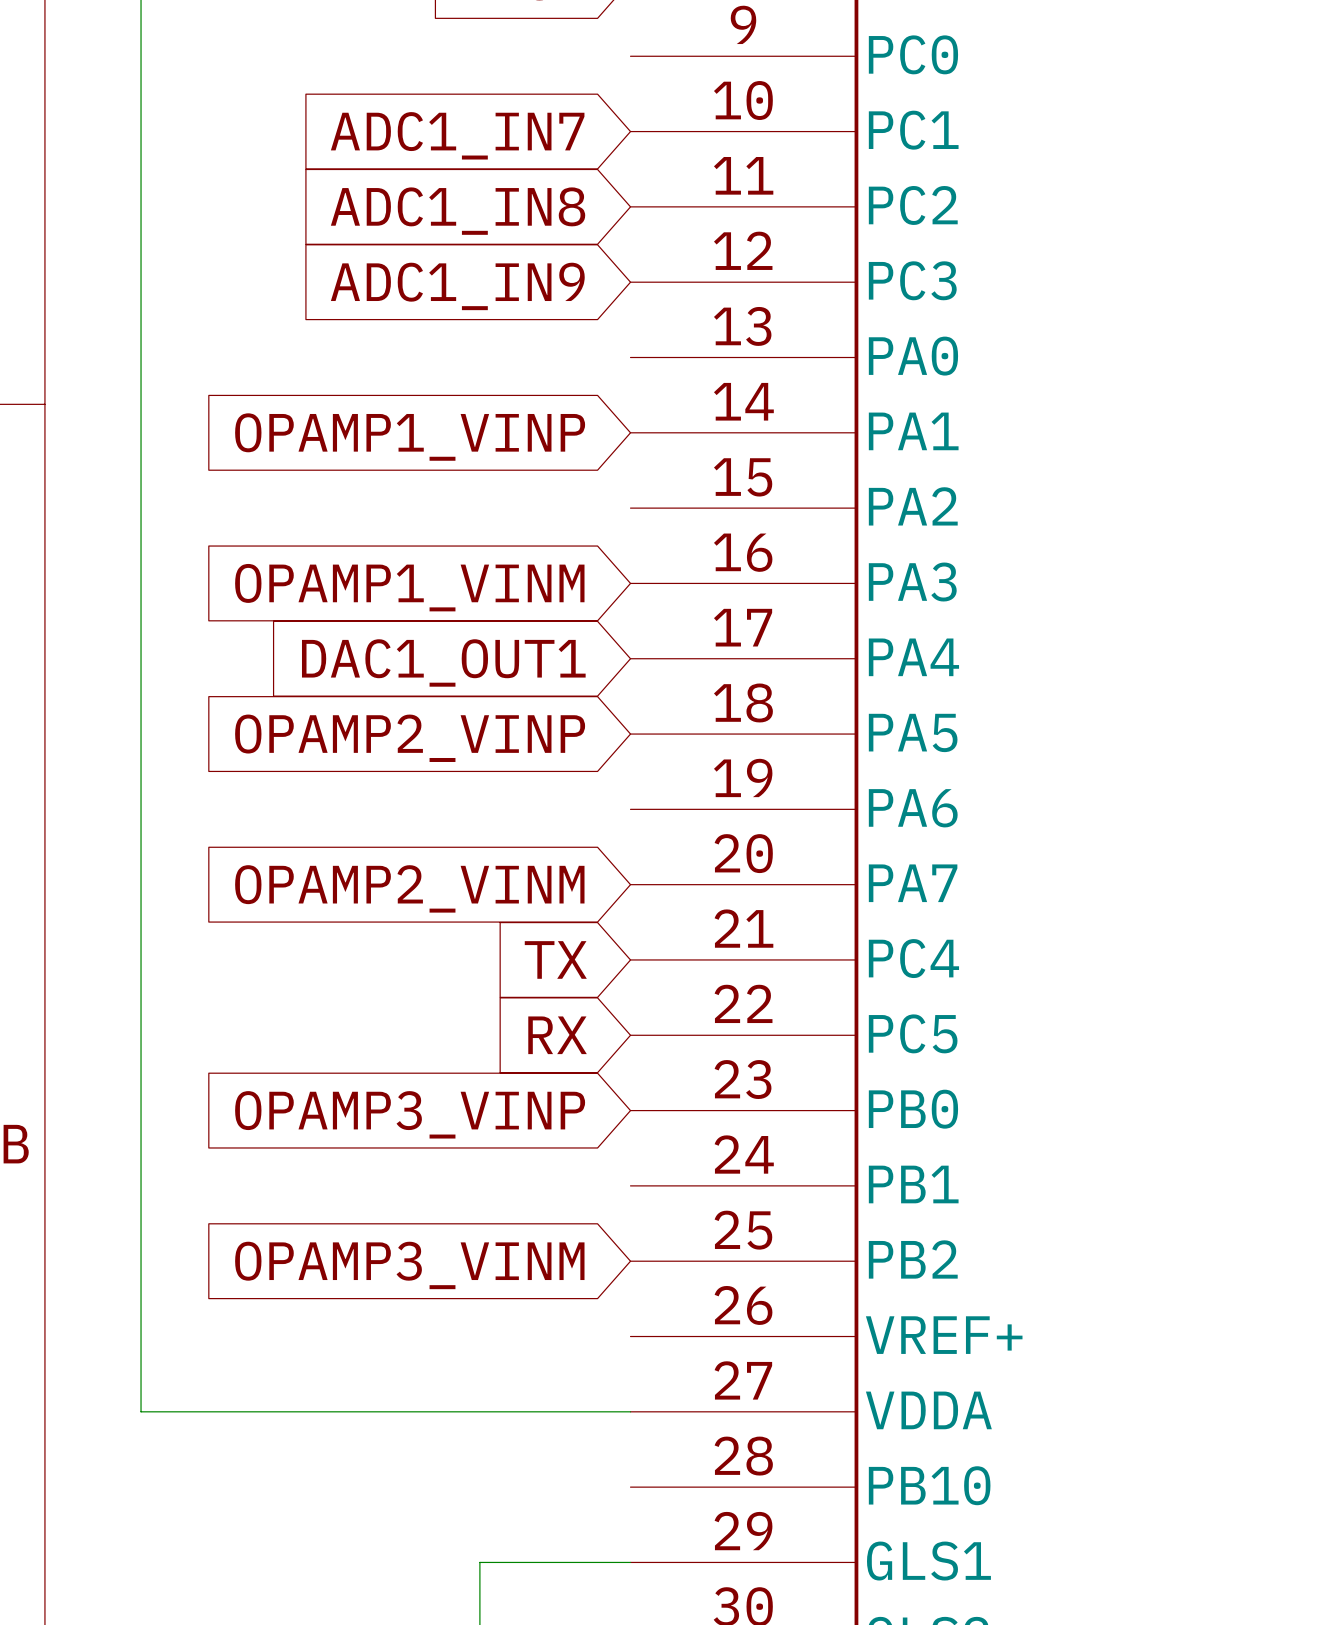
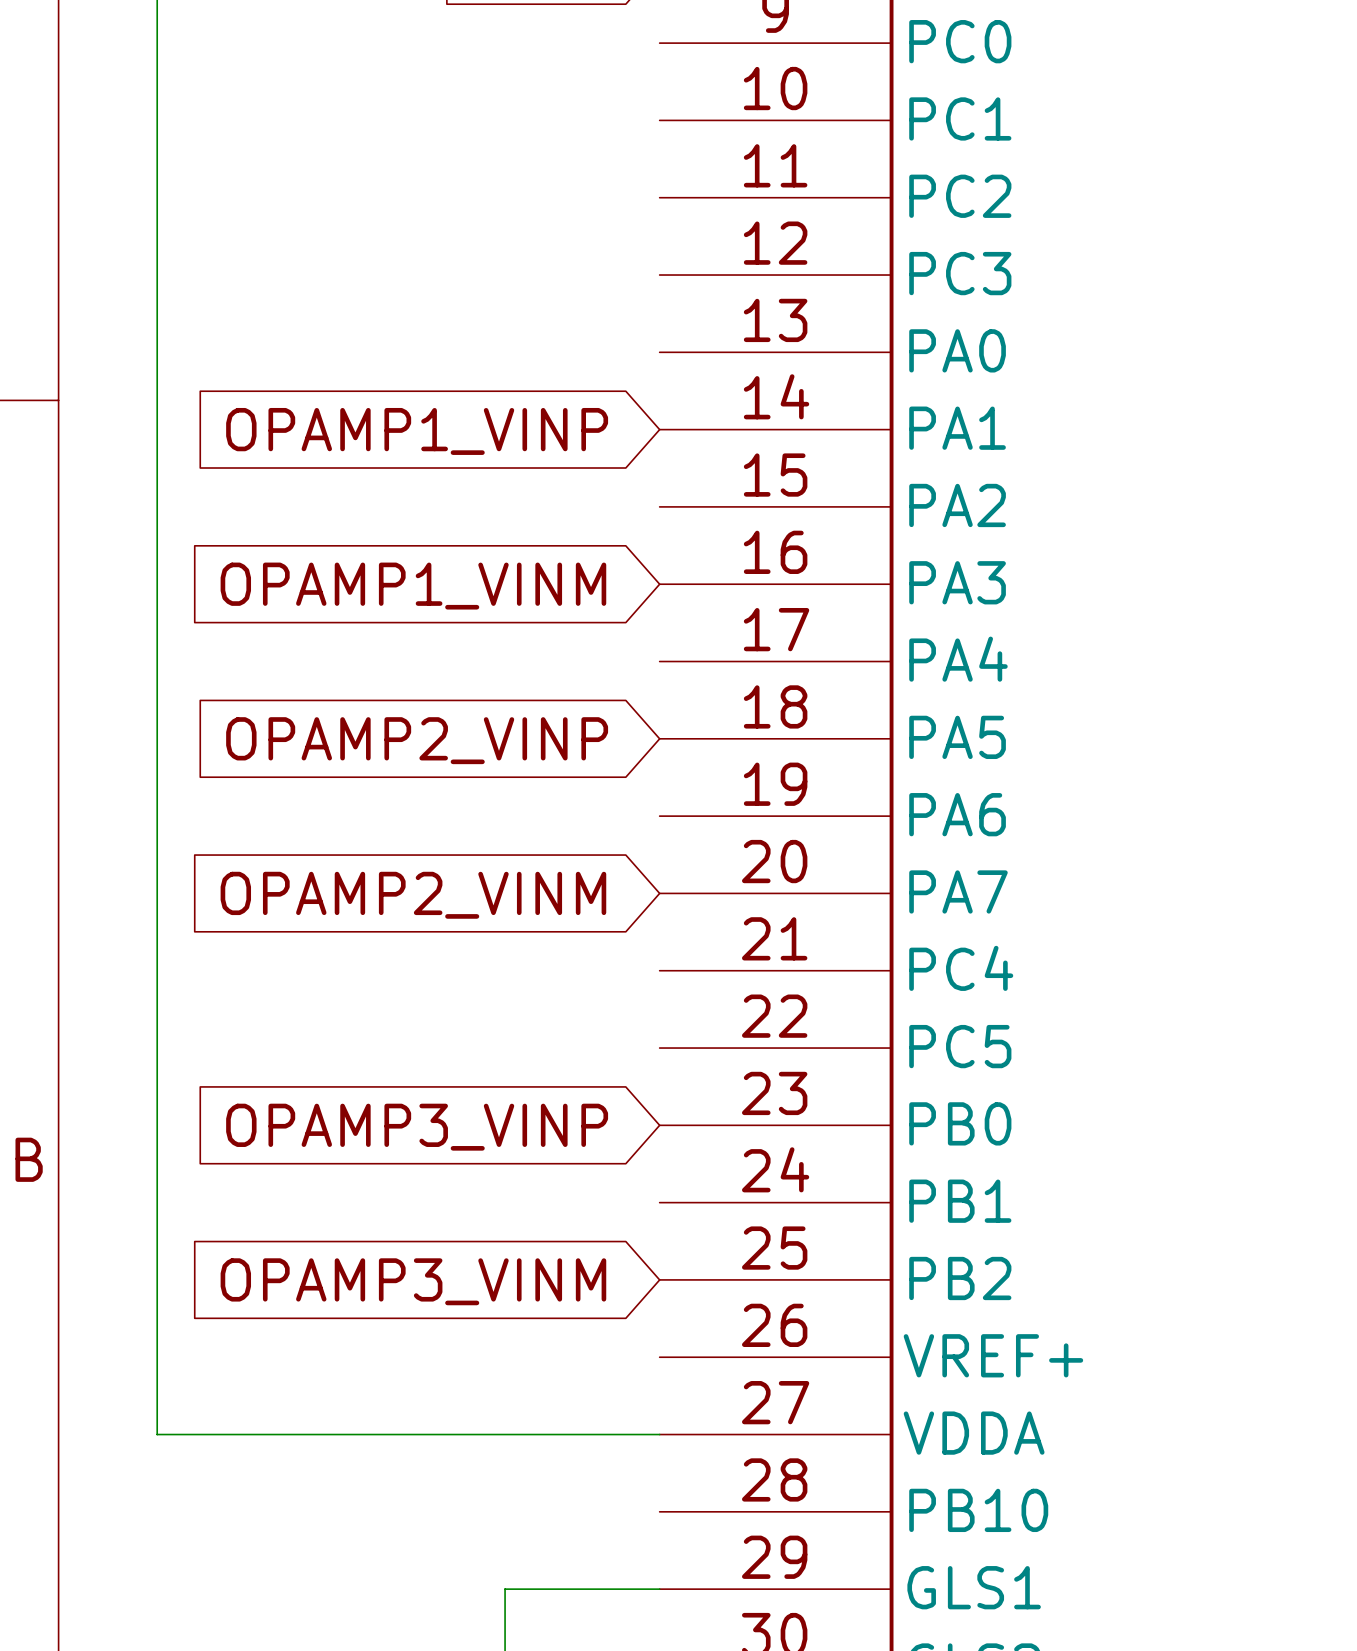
global label: ADC1_IN7 (457, 135) -> none
global label: ADC1_IN8 (458, 211) -> none
global label: ADC1_IN9 (457, 286) -> none
global label: DAC1_OUT1 (443, 662) -> none
global label: TX (555, 959) -> none
global label: RX (557, 1035) -> none

